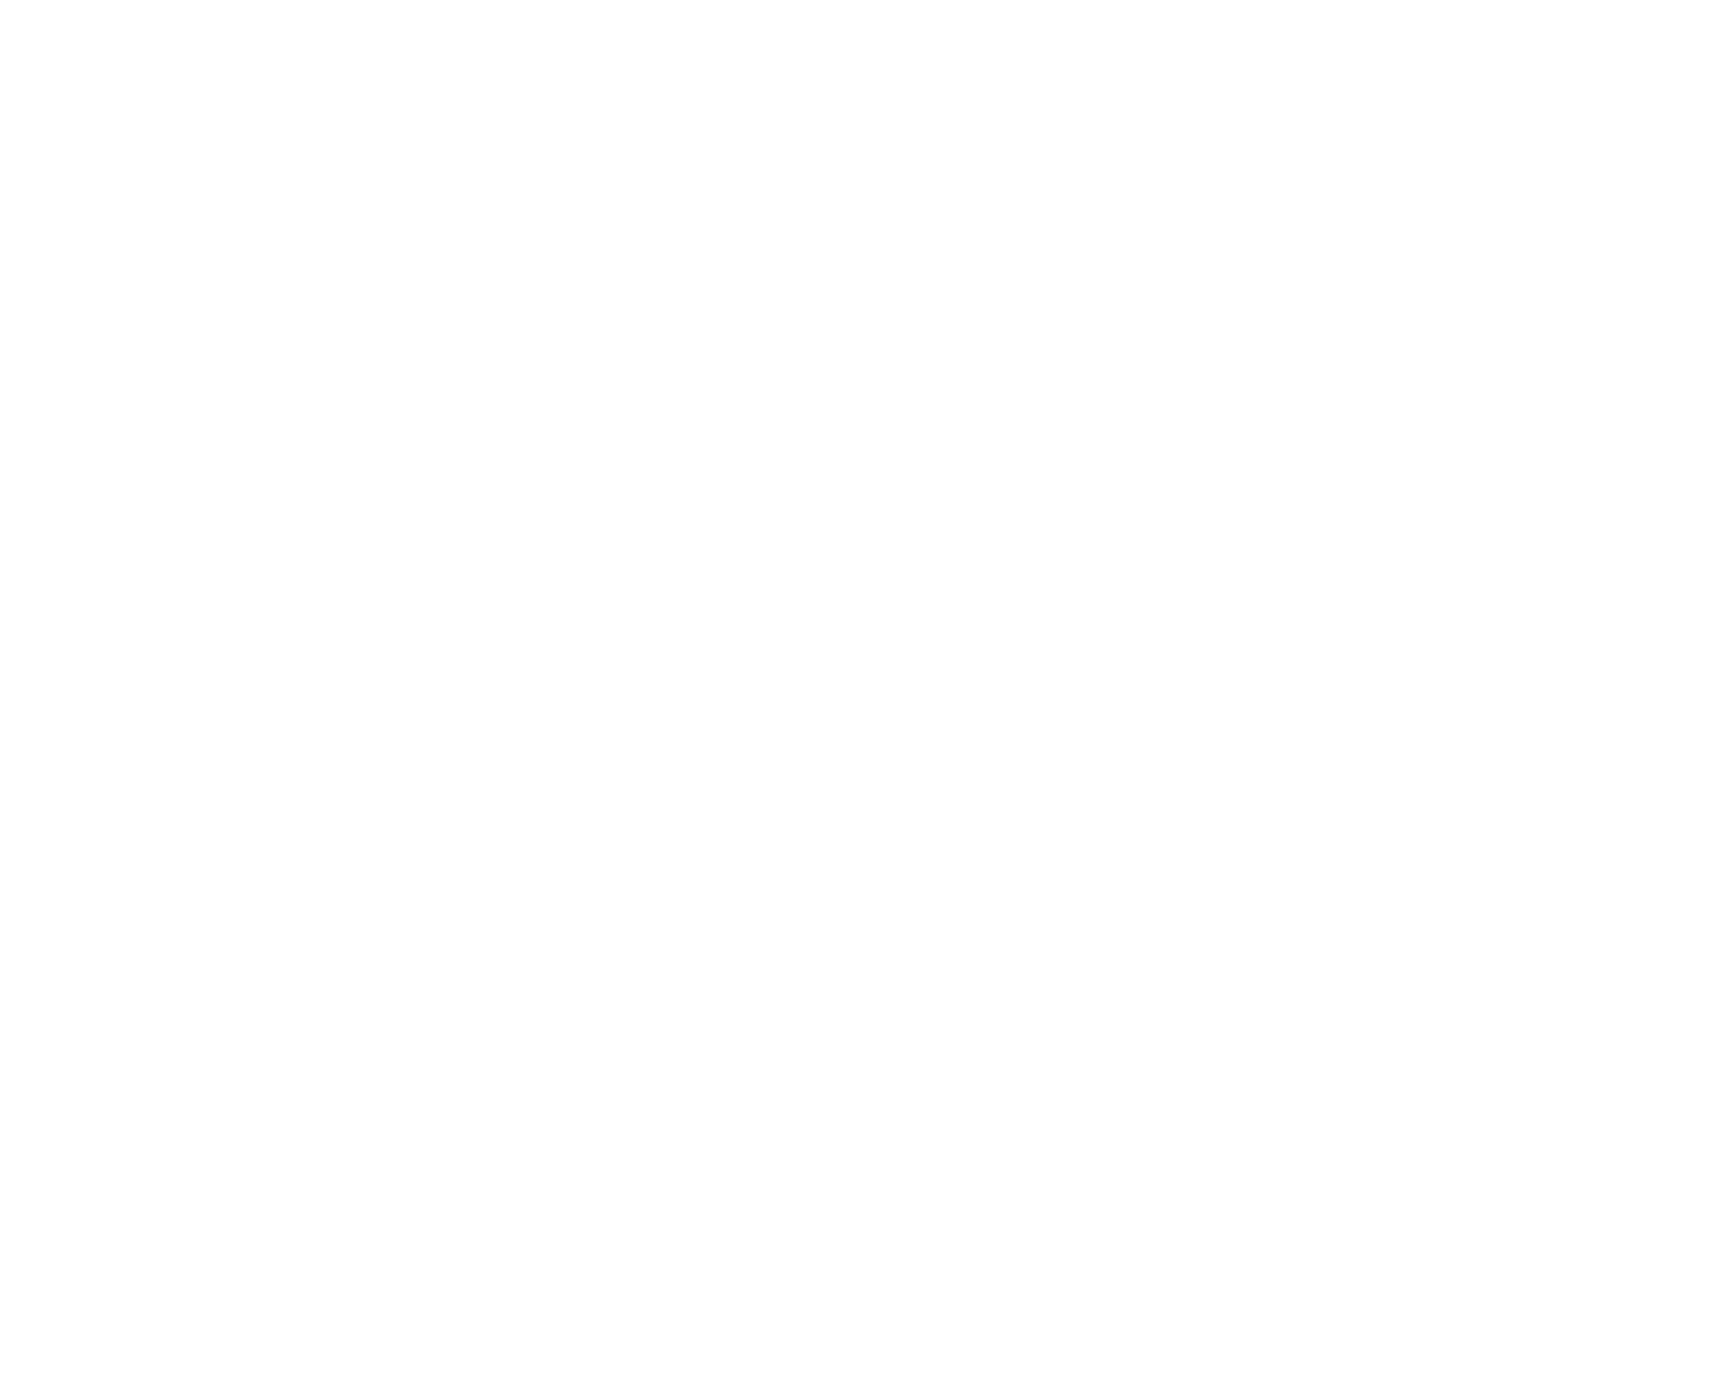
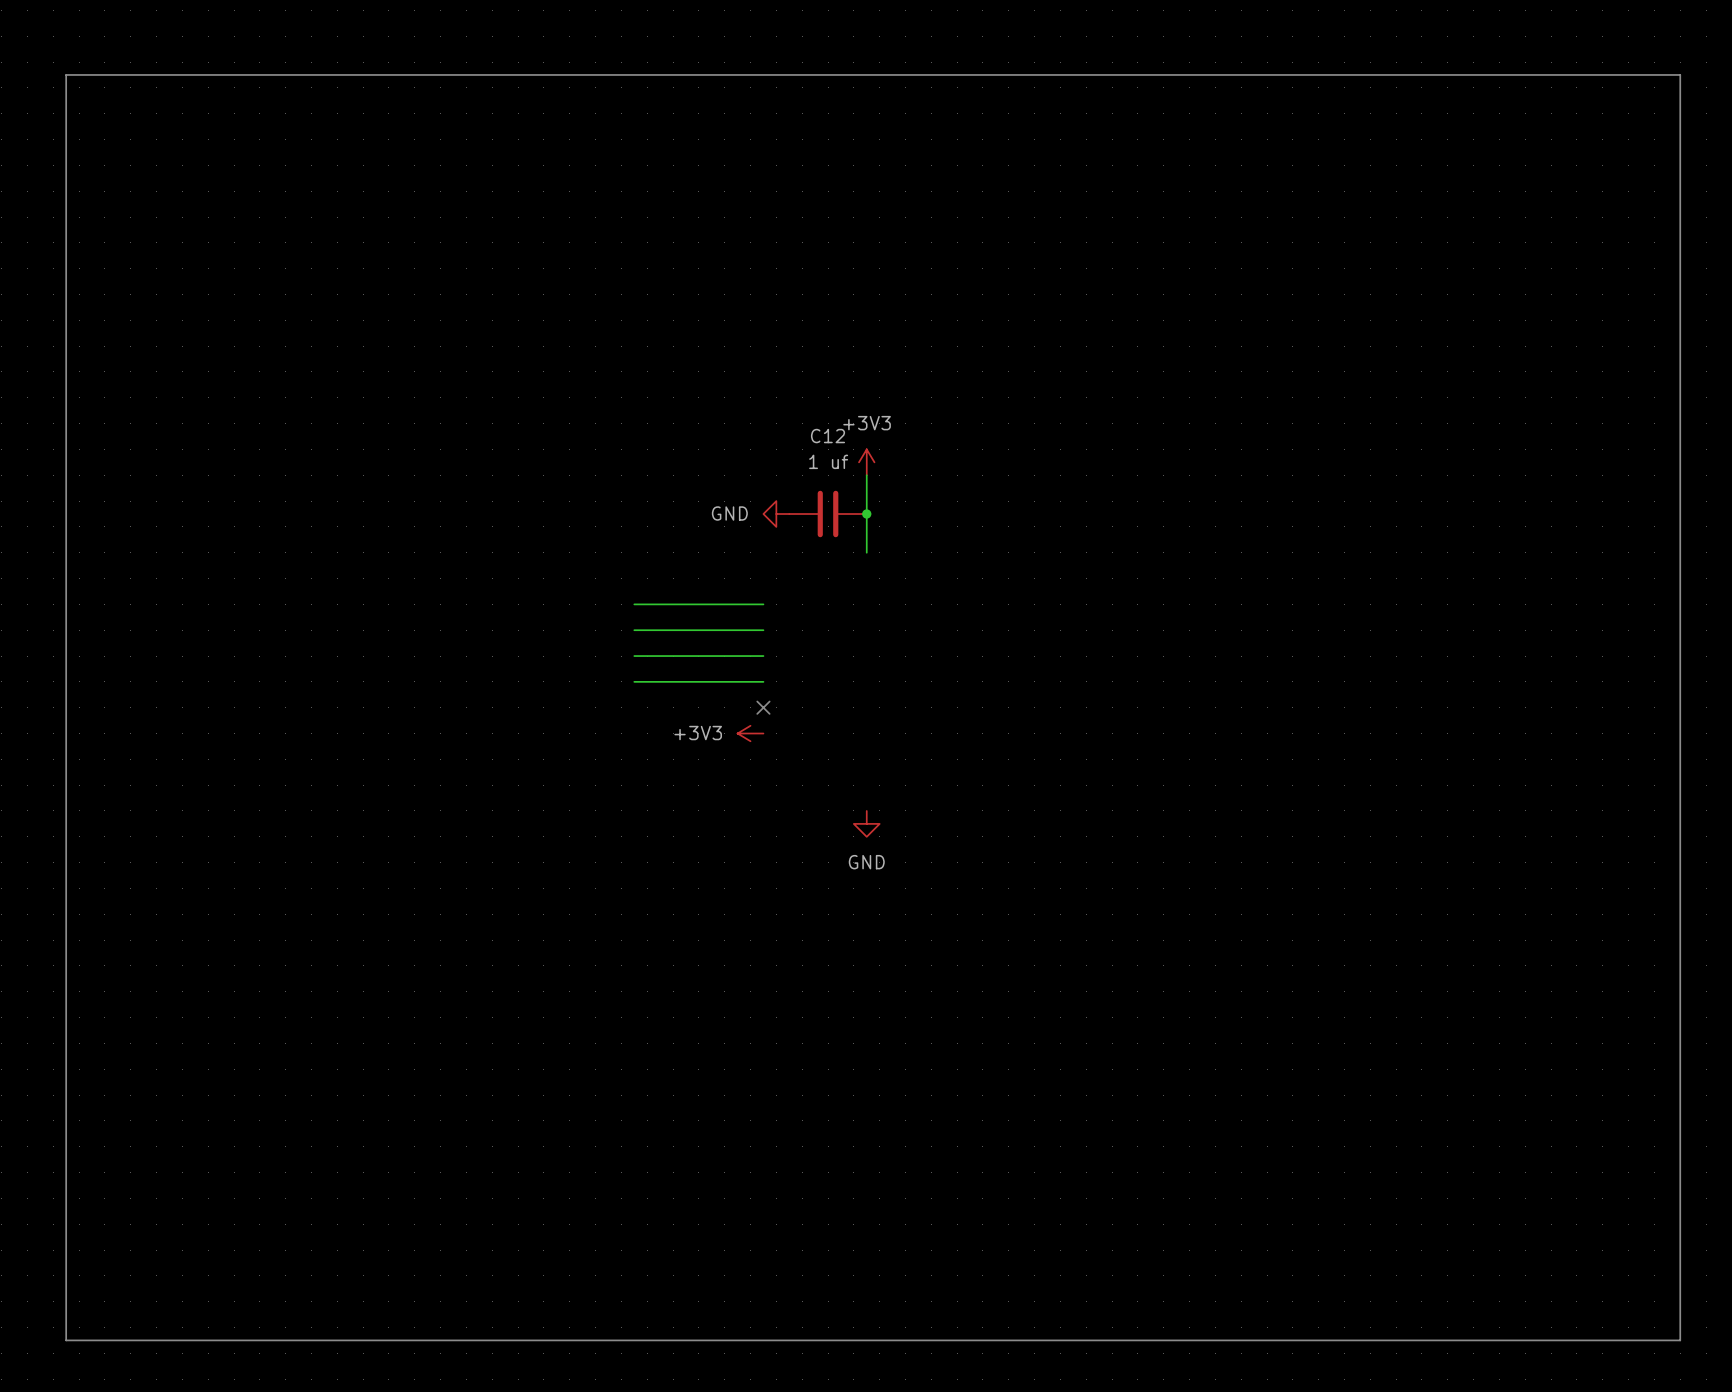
line: none -> (66, 74) (1680, 74) (1680, 1340) (66, 1340) (66, 74)
power symbol: none -> +3V3 (866, 462)
wire: none -> (866, 475) (866, 552)
power symbol: none -> GND (776, 514)
C12: none -> 1 uf (828, 514)
junction: none -> (866, 514)
wire: none -> (634, 604) (763, 604)
wire: none -> (634, 630) (763, 630)
wire: none -> (634, 656) (763, 656)
wire: none -> (634, 681) (763, 681)
no-connect mark: none -> (763, 707)
power symbol: none -> +3V3 (750, 733)
power symbol: none -> GND (866, 823)

